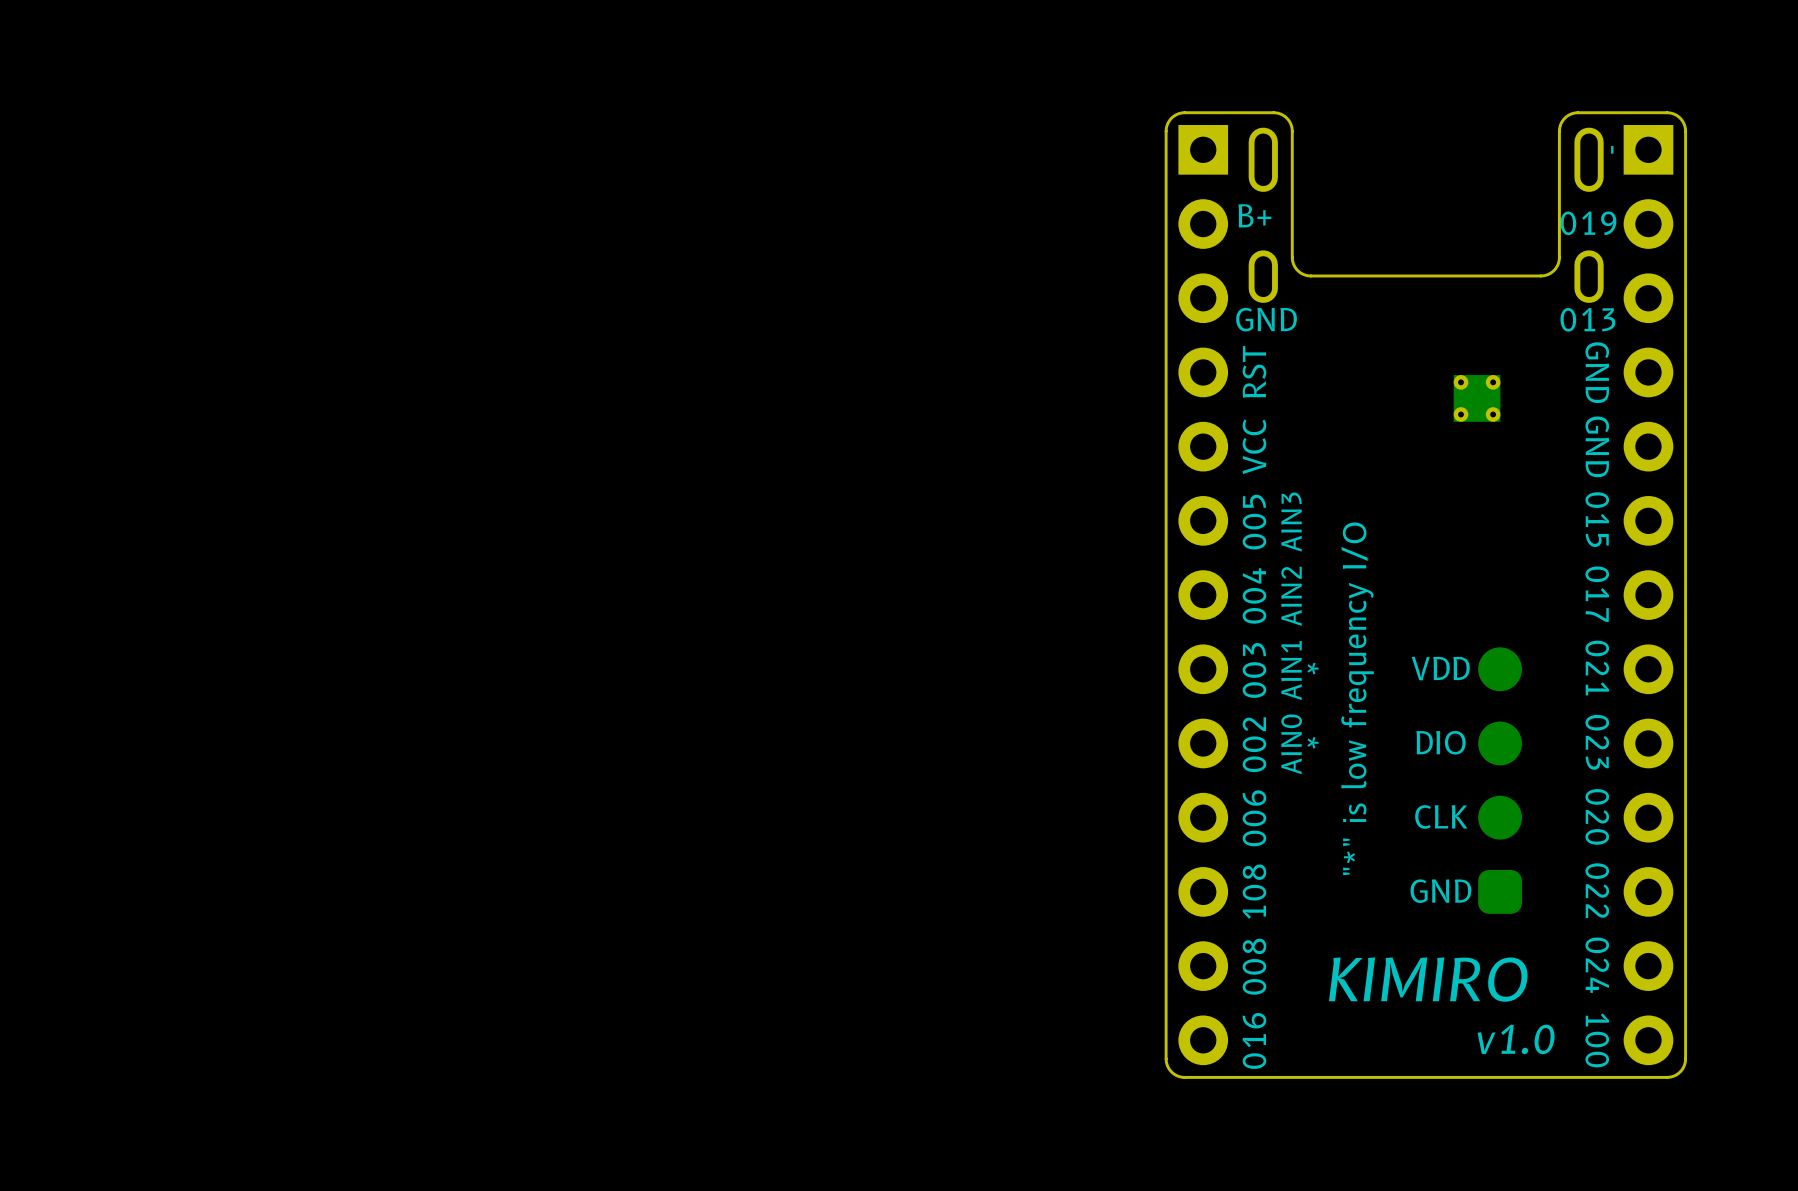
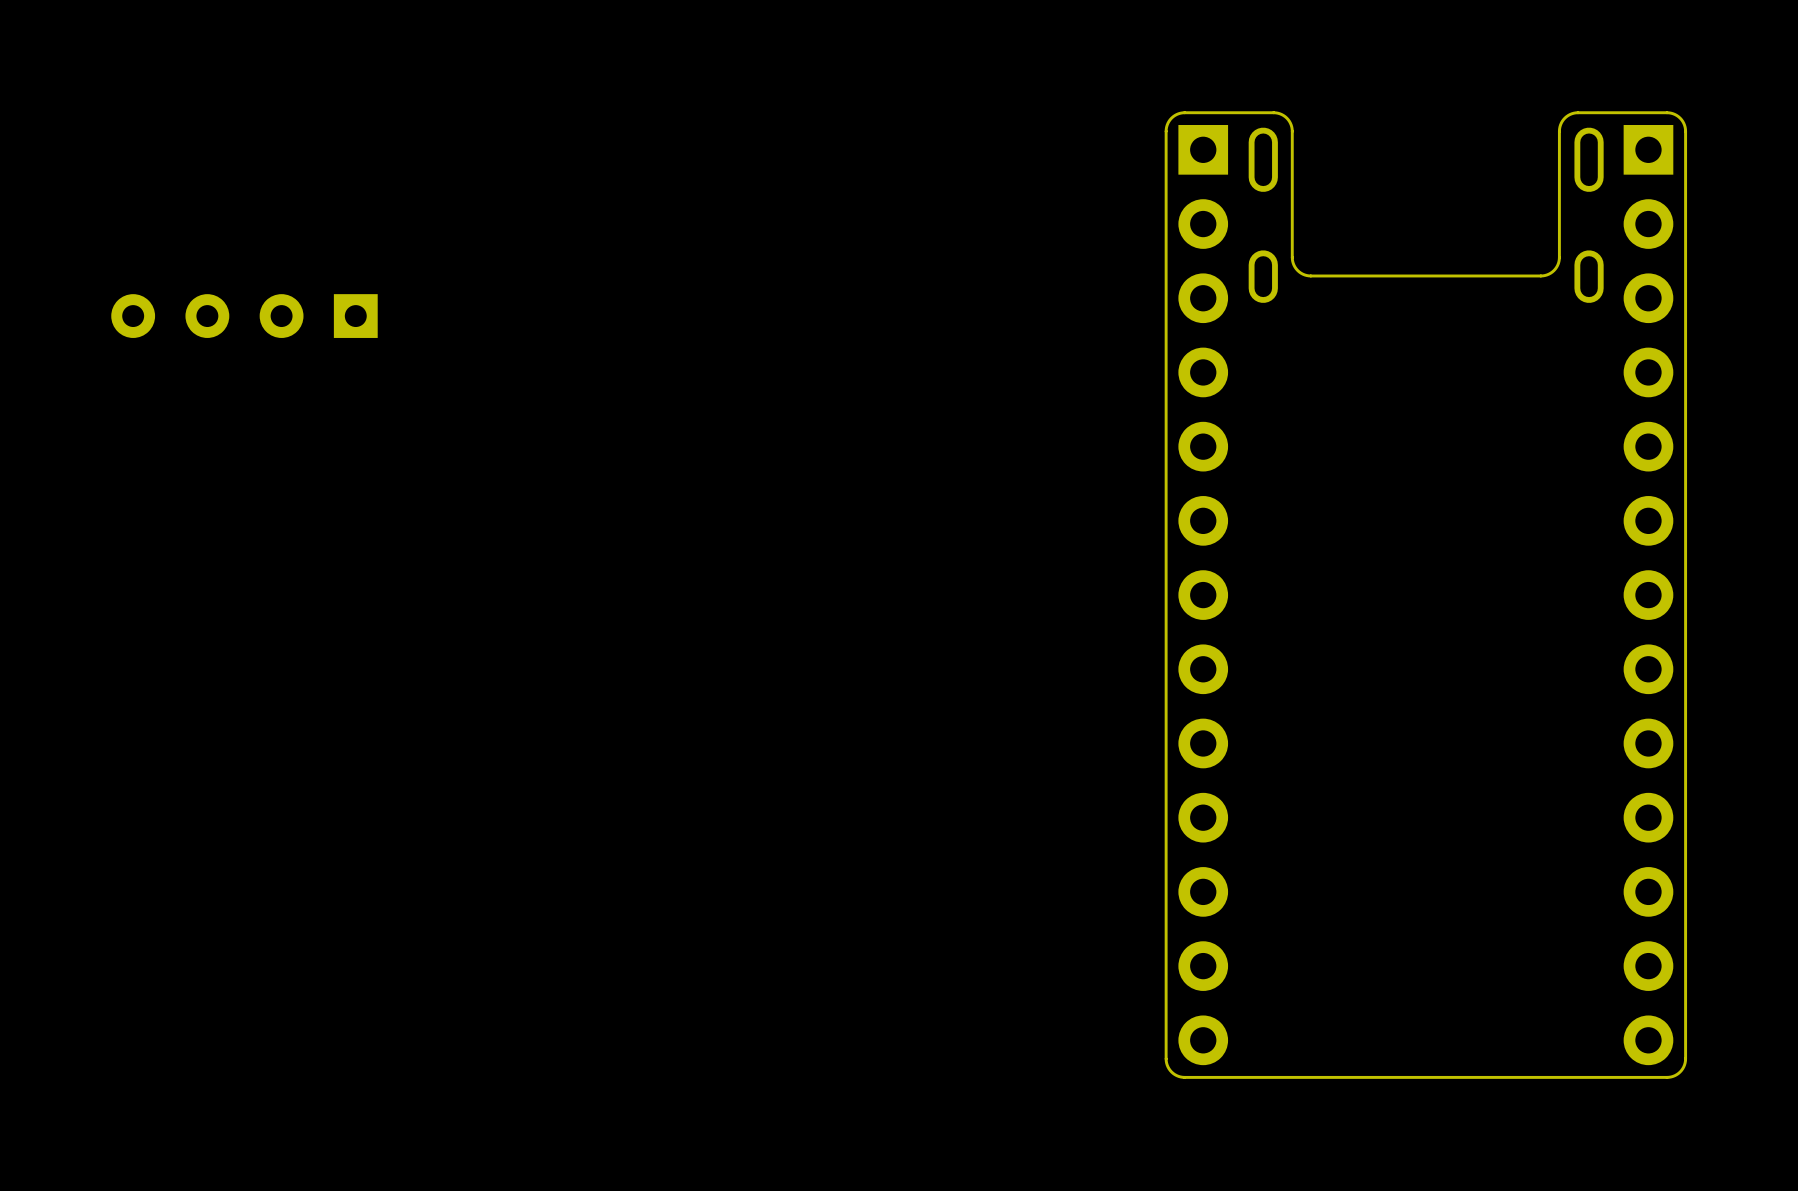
text: - (1612, 149) -> none
text: B+ (1254, 215) -> none
text: 019 (1588, 223) -> none
part: none -> (244, 316)
text: GND (1266, 319) -> none
text: 013 (1587, 319) -> none
text: RST (1254, 371) -> none
text: GND (1597, 372) -> none
part: (1477, 398) -> none
text: VCC (1254, 446) -> none
text: GND (1597, 446) -> none
text: 015 (1597, 519) -> none
text: 005 (1254, 522) -> none
text: AIN3 (1291, 522) -> none
text: 017 (1597, 594) -> none
text: 004 (1254, 595) -> none
text: AIN2 (1291, 596) -> none
text: * (1312, 668) -> none
text: VDD (1440, 668) -> none
text: 021 (1597, 668) -> none
text: 003 (1254, 670) -> none
text: AIN1 (1291, 670) -> none
text: "*" is low frequency I/O (1357, 698) -> none
text: * (1312, 742) -> none
text: DIO (1441, 742) -> none
text: 023 (1597, 742) -> none
text: 002 (1254, 744) -> none
text: AIN0 (1291, 744) -> none
part: (1500, 780) -> none
text: CLK (1441, 816) -> none
text: 020 (1597, 816) -> none
text: 006 (1254, 818) -> none
text: 022 (1597, 890) -> none
text: 108 (1254, 891) -> none
text: GND (1440, 891) -> none
text: 024 (1597, 965) -> none
text: 008 (1254, 966) -> none
text: KIMIRO (1428, 979) -> none
text: v1.0 (1516, 1039) -> none
text: 016 (1254, 1040) -> none
text: 100 (1597, 1040) -> none

